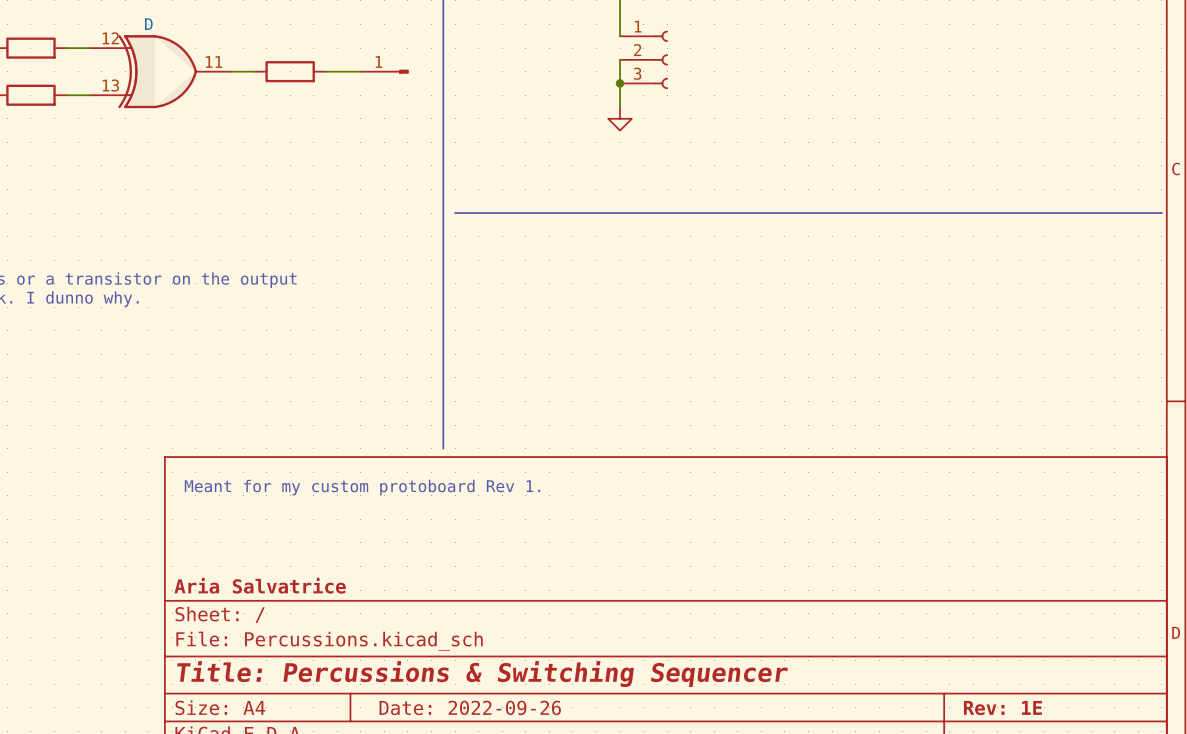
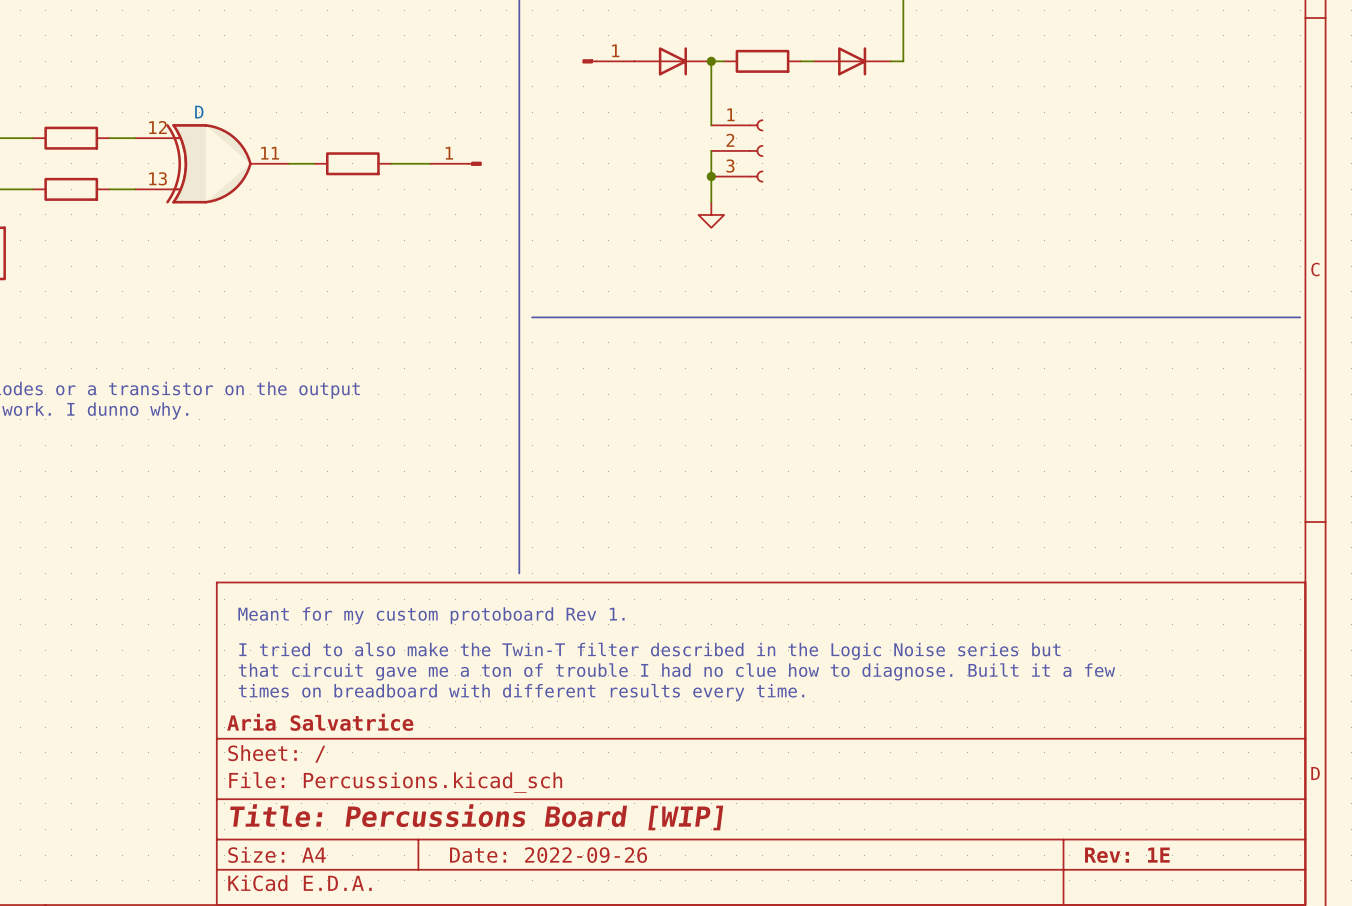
text: none -> I tried to also make the Twin-T filter described in the Logic Noise series but (649, 651)
text: none -> that circuit gave me a ton of trouble I had no clue how to diagnose. Built it a few (676, 671)
text: none -> times on breadboard with different results every time. (521, 692)
title block: Title: Percussions & Switching Sequencer (482, 674) -> Title: Percussions Board [WIP] (476, 817)

